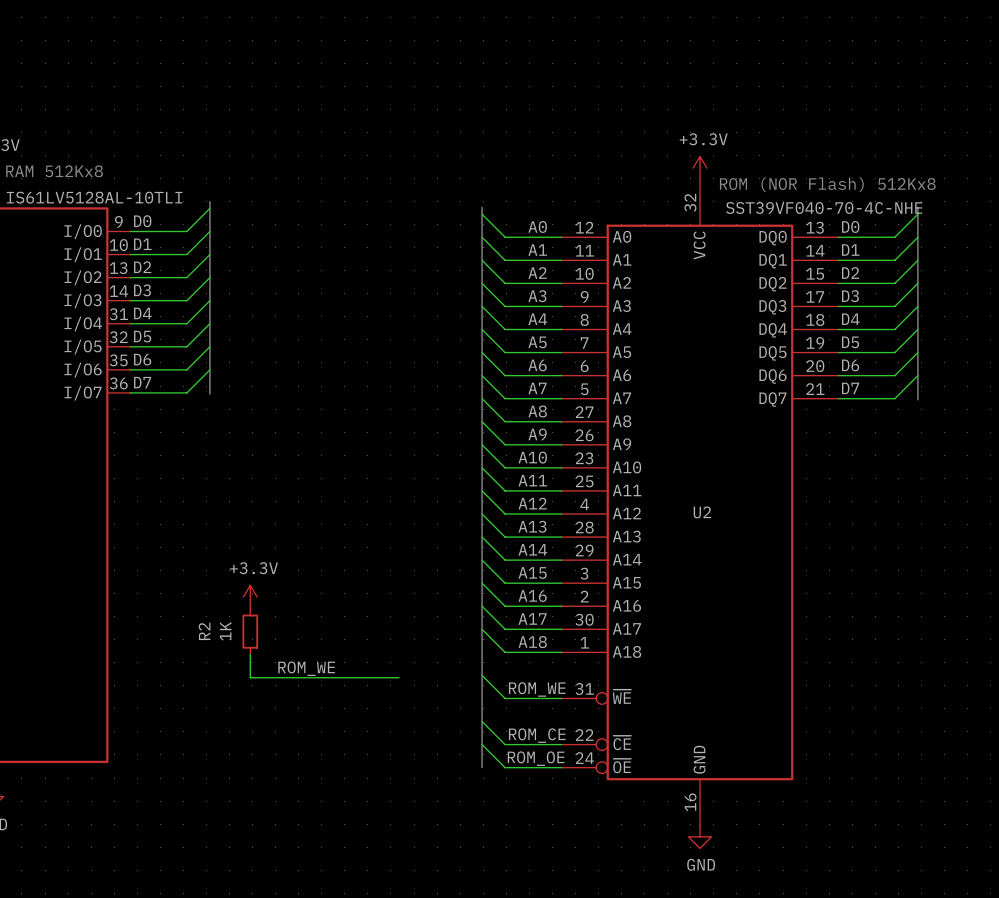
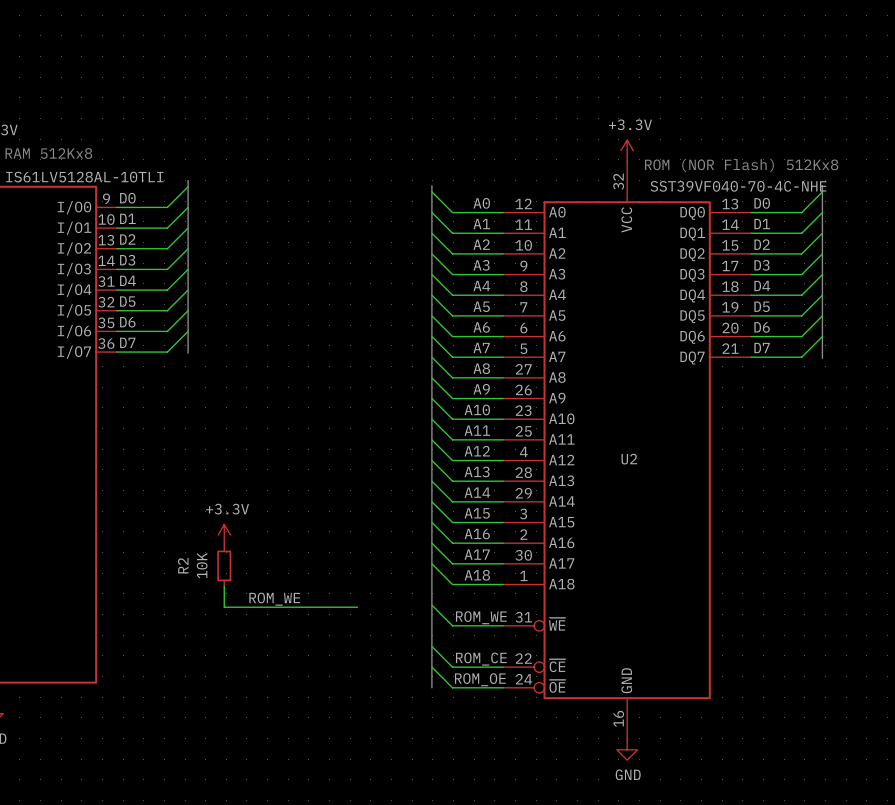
R2 value: 1K (225, 631) -> 10K (202, 565)

